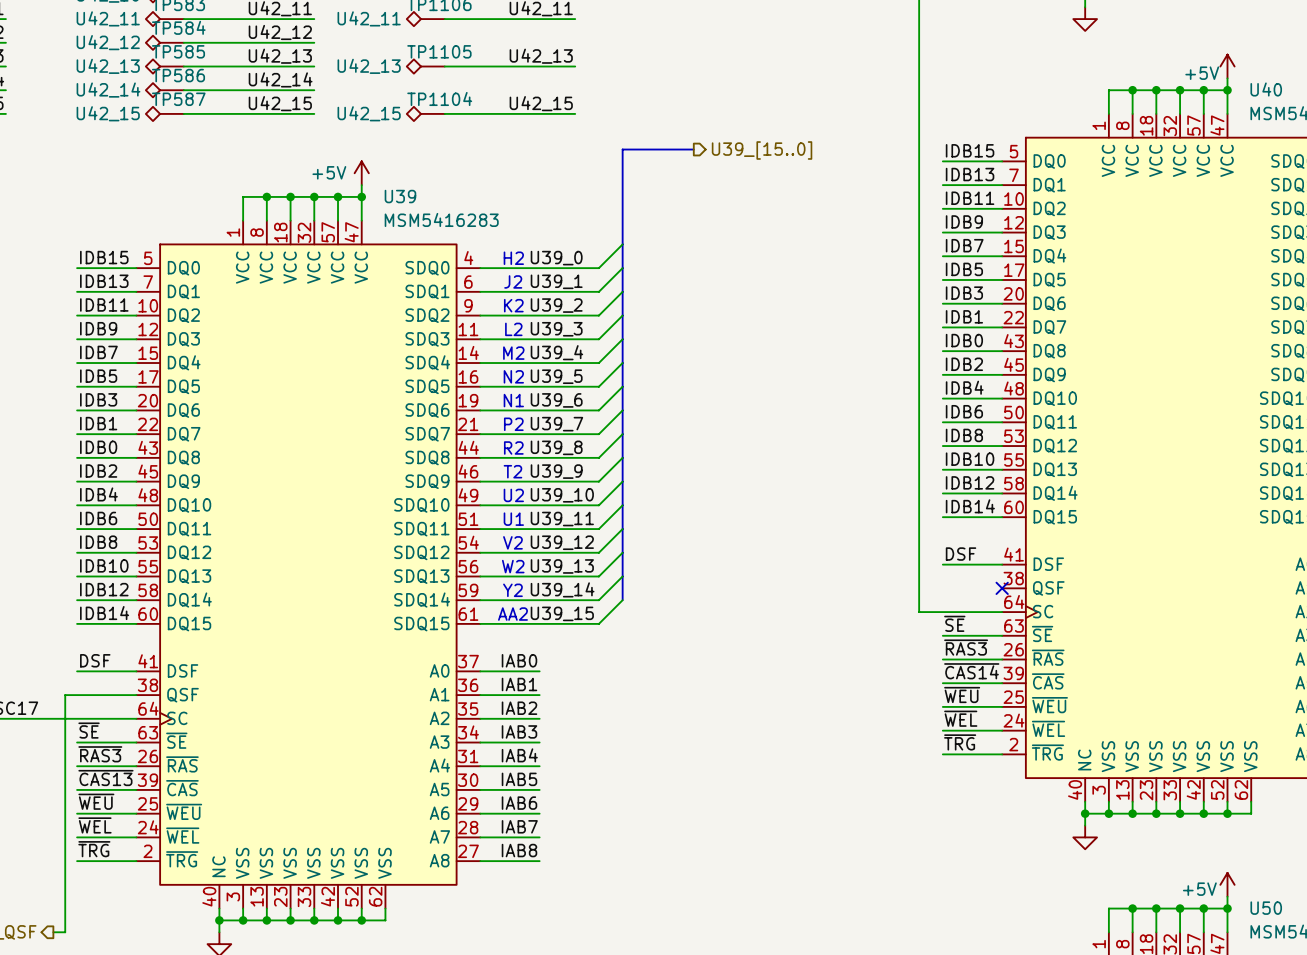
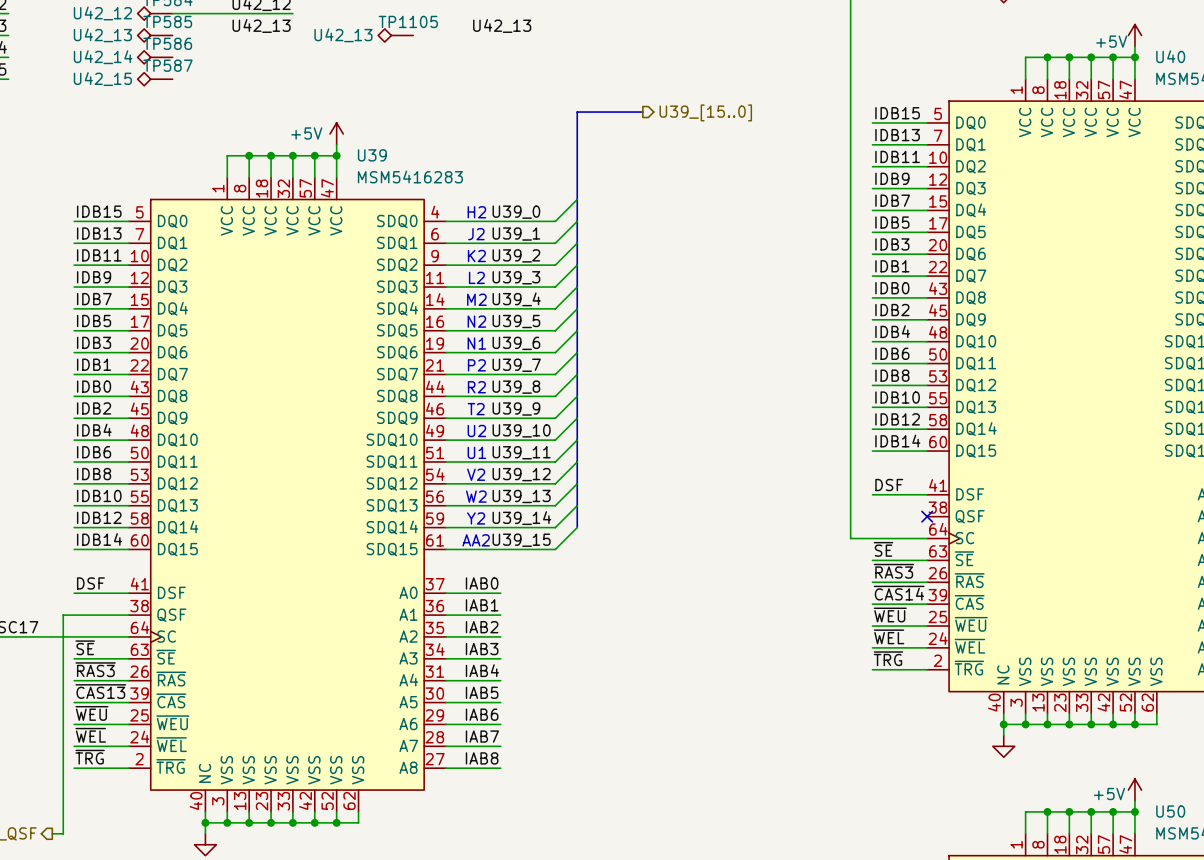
wire: (183, 66) (314, 66) -> none
wire: (444, 66) (575, 66) -> none
label: U42_14 (280, 79) -> none
wire: (183, 90) (314, 90) -> none
label: U42_15 (280, 103) -> none
label: U42_15 (541, 103) -> none
wire: (183, 113) (314, 113) -> none
TP1104: U42_15 (425, 113) -> none
wire: (444, 113) (575, 113) -> none

